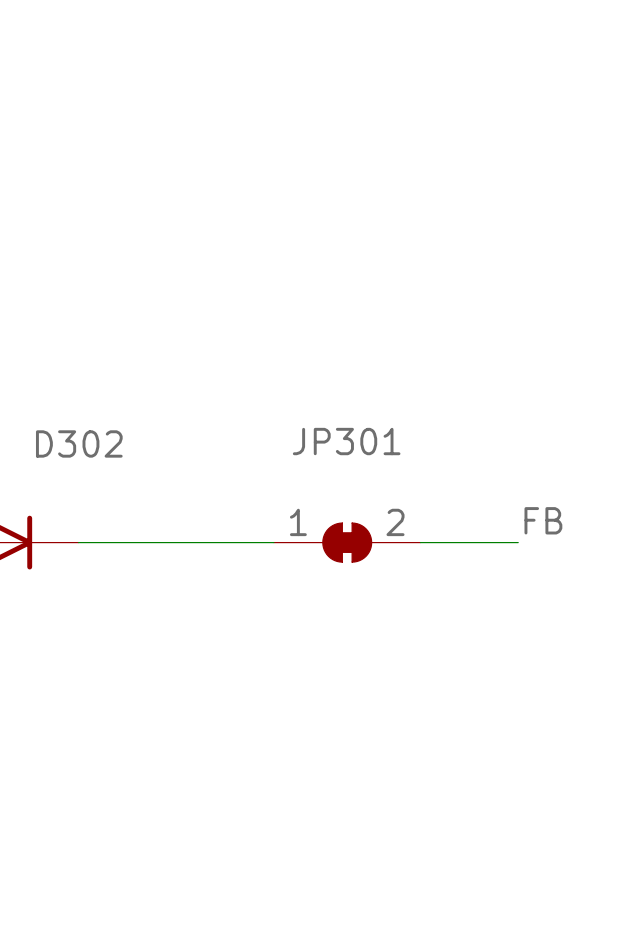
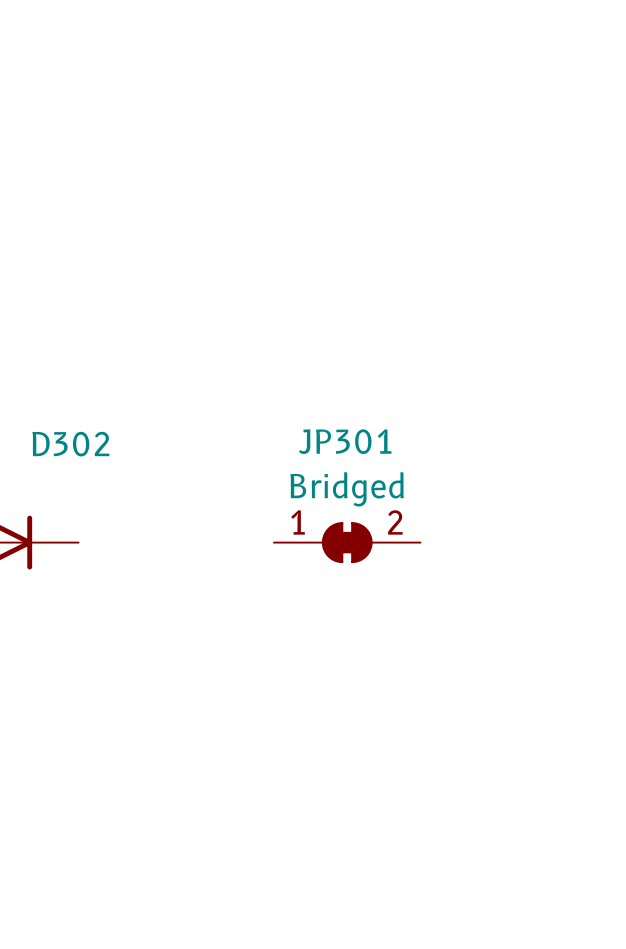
JP301 value: none -> Bridged (347, 489)
label: FB (543, 520) -> none
wire: (78, 542) (273, 542) -> none
wire: (420, 542) (518, 542) -> none

